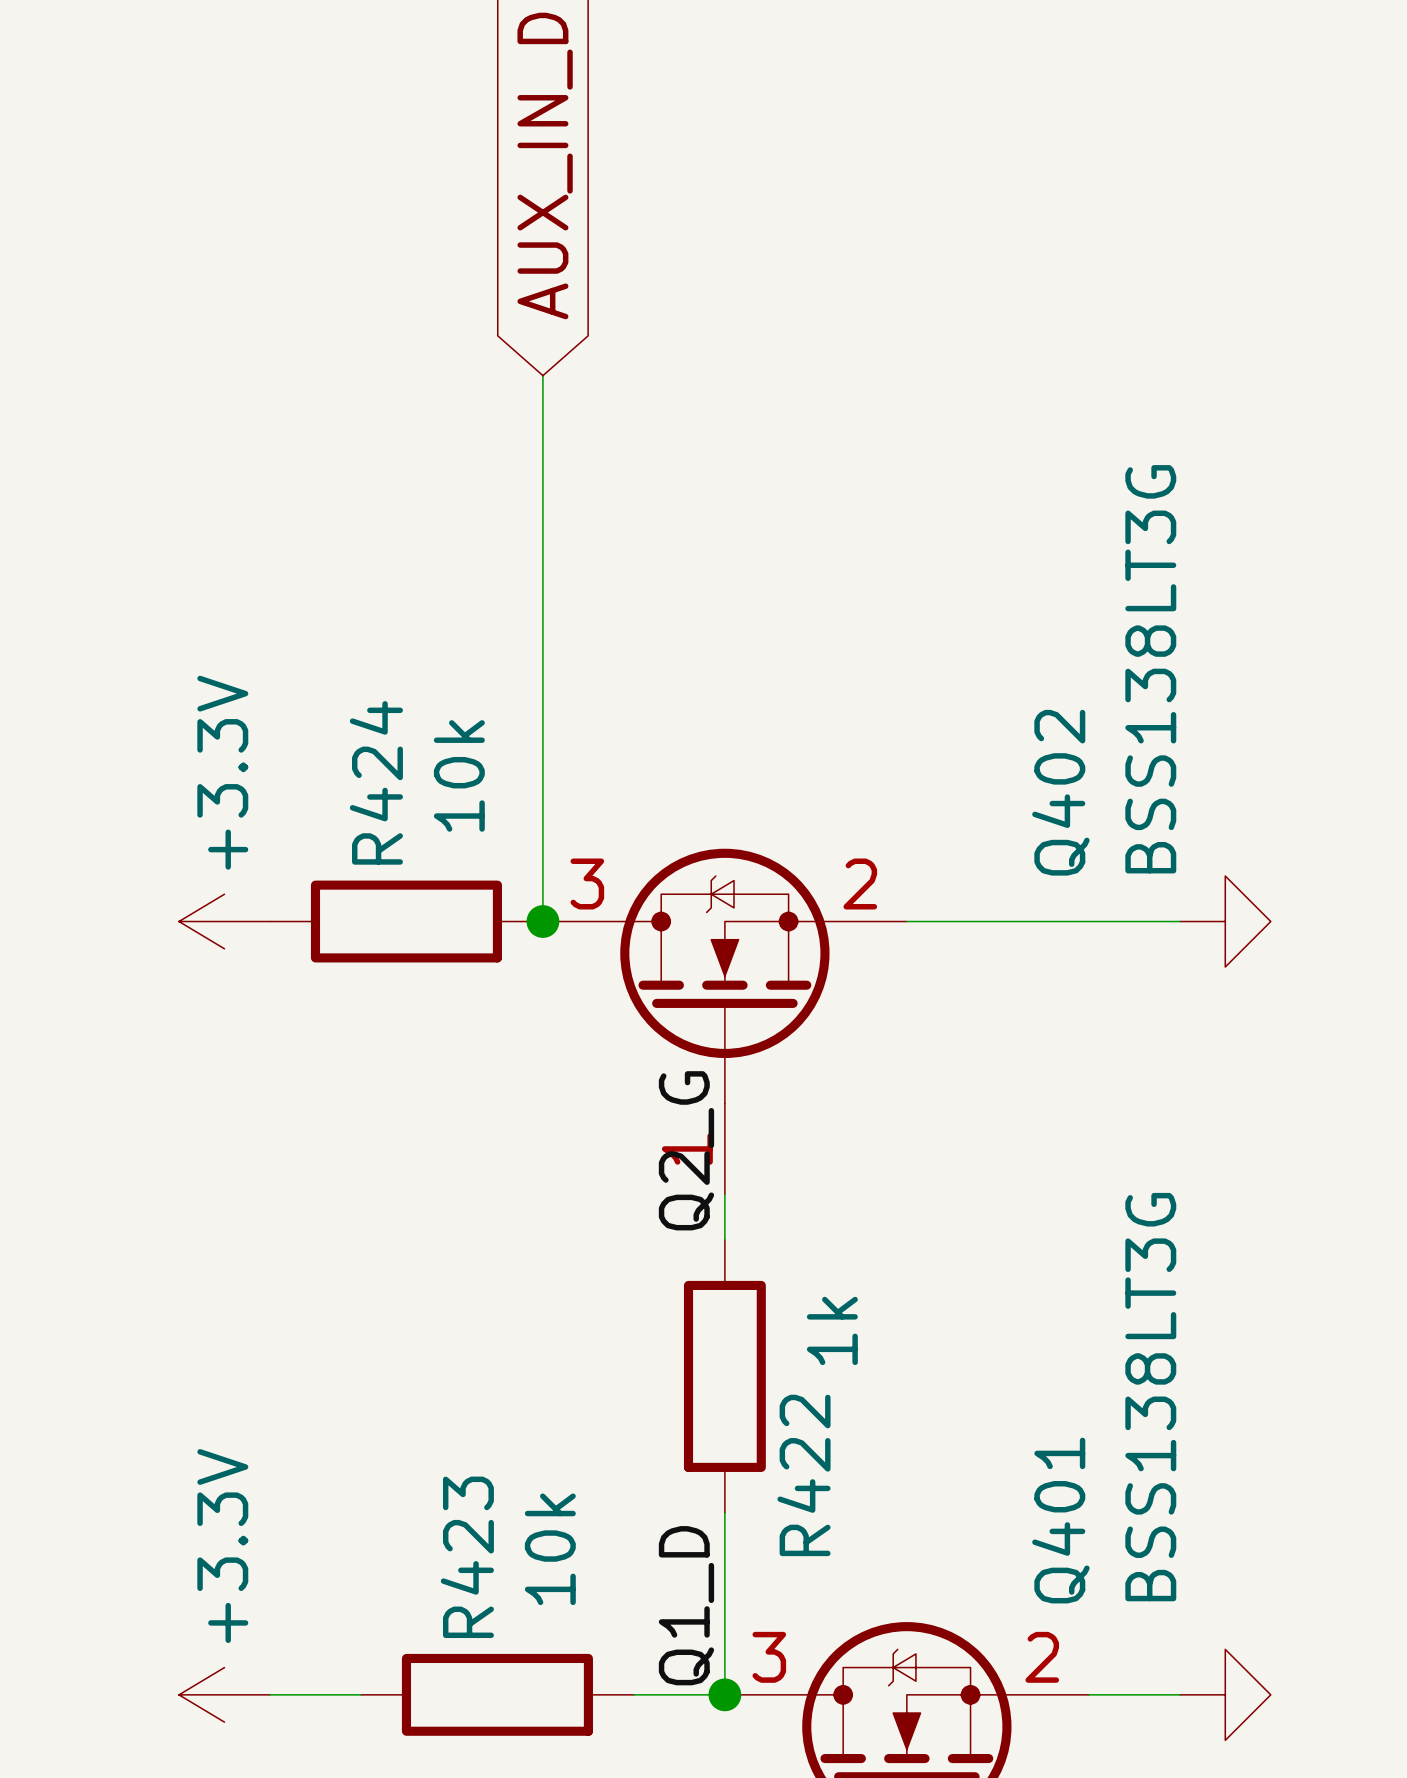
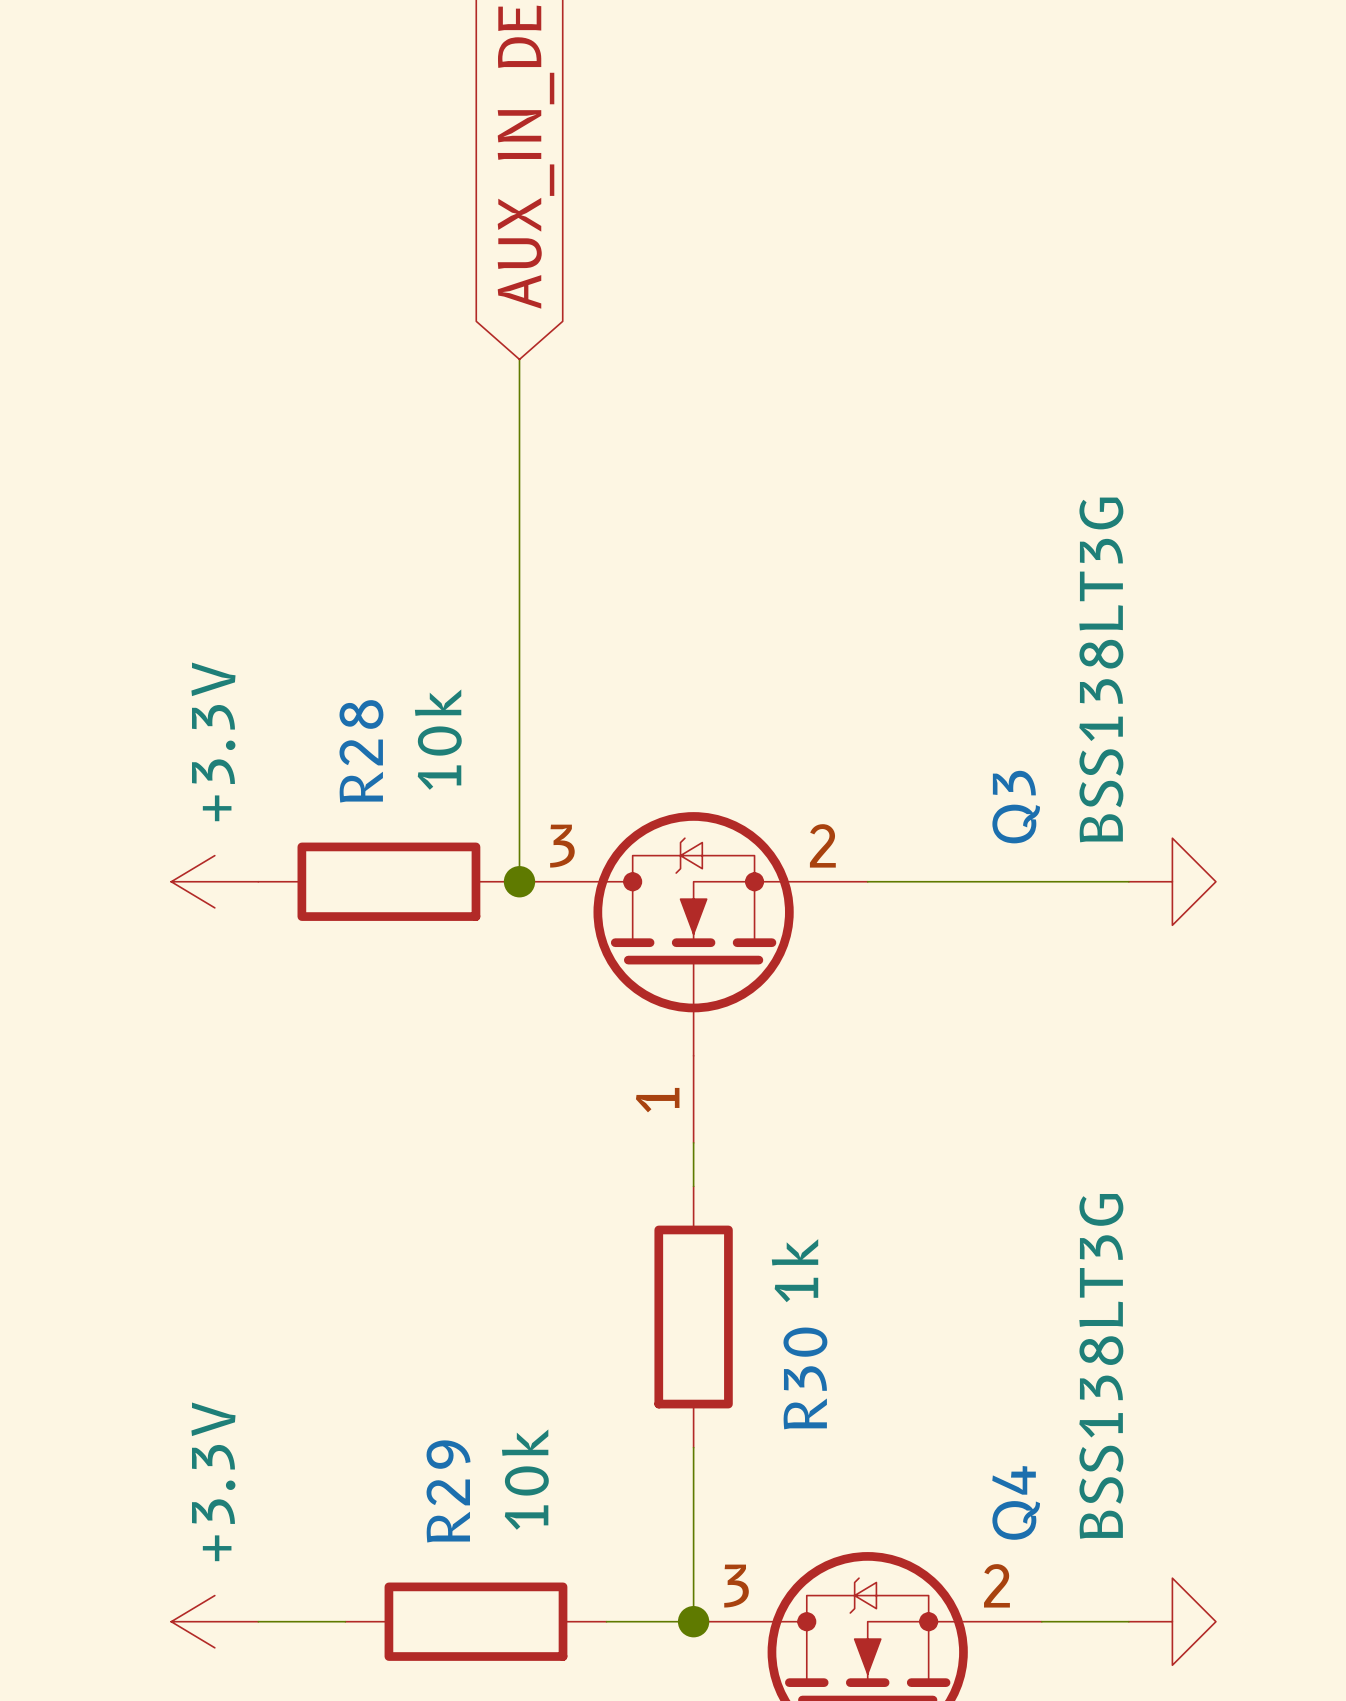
R424 name: R424 (376, 782) -> R28 (361, 751)
Q402 name: Q402 (1060, 792) -> Q3 (1016, 807)
label: Q2_G (686, 1150) -> none
R422 name: R422 (803, 1475) -> R30 (805, 1378)
Q401 name: Q401 (1060, 1520) -> Q4 (1016, 1502)
R423 name: R423 (467, 1557) -> R29 (448, 1491)
label: Q1_D (686, 1605) -> none

